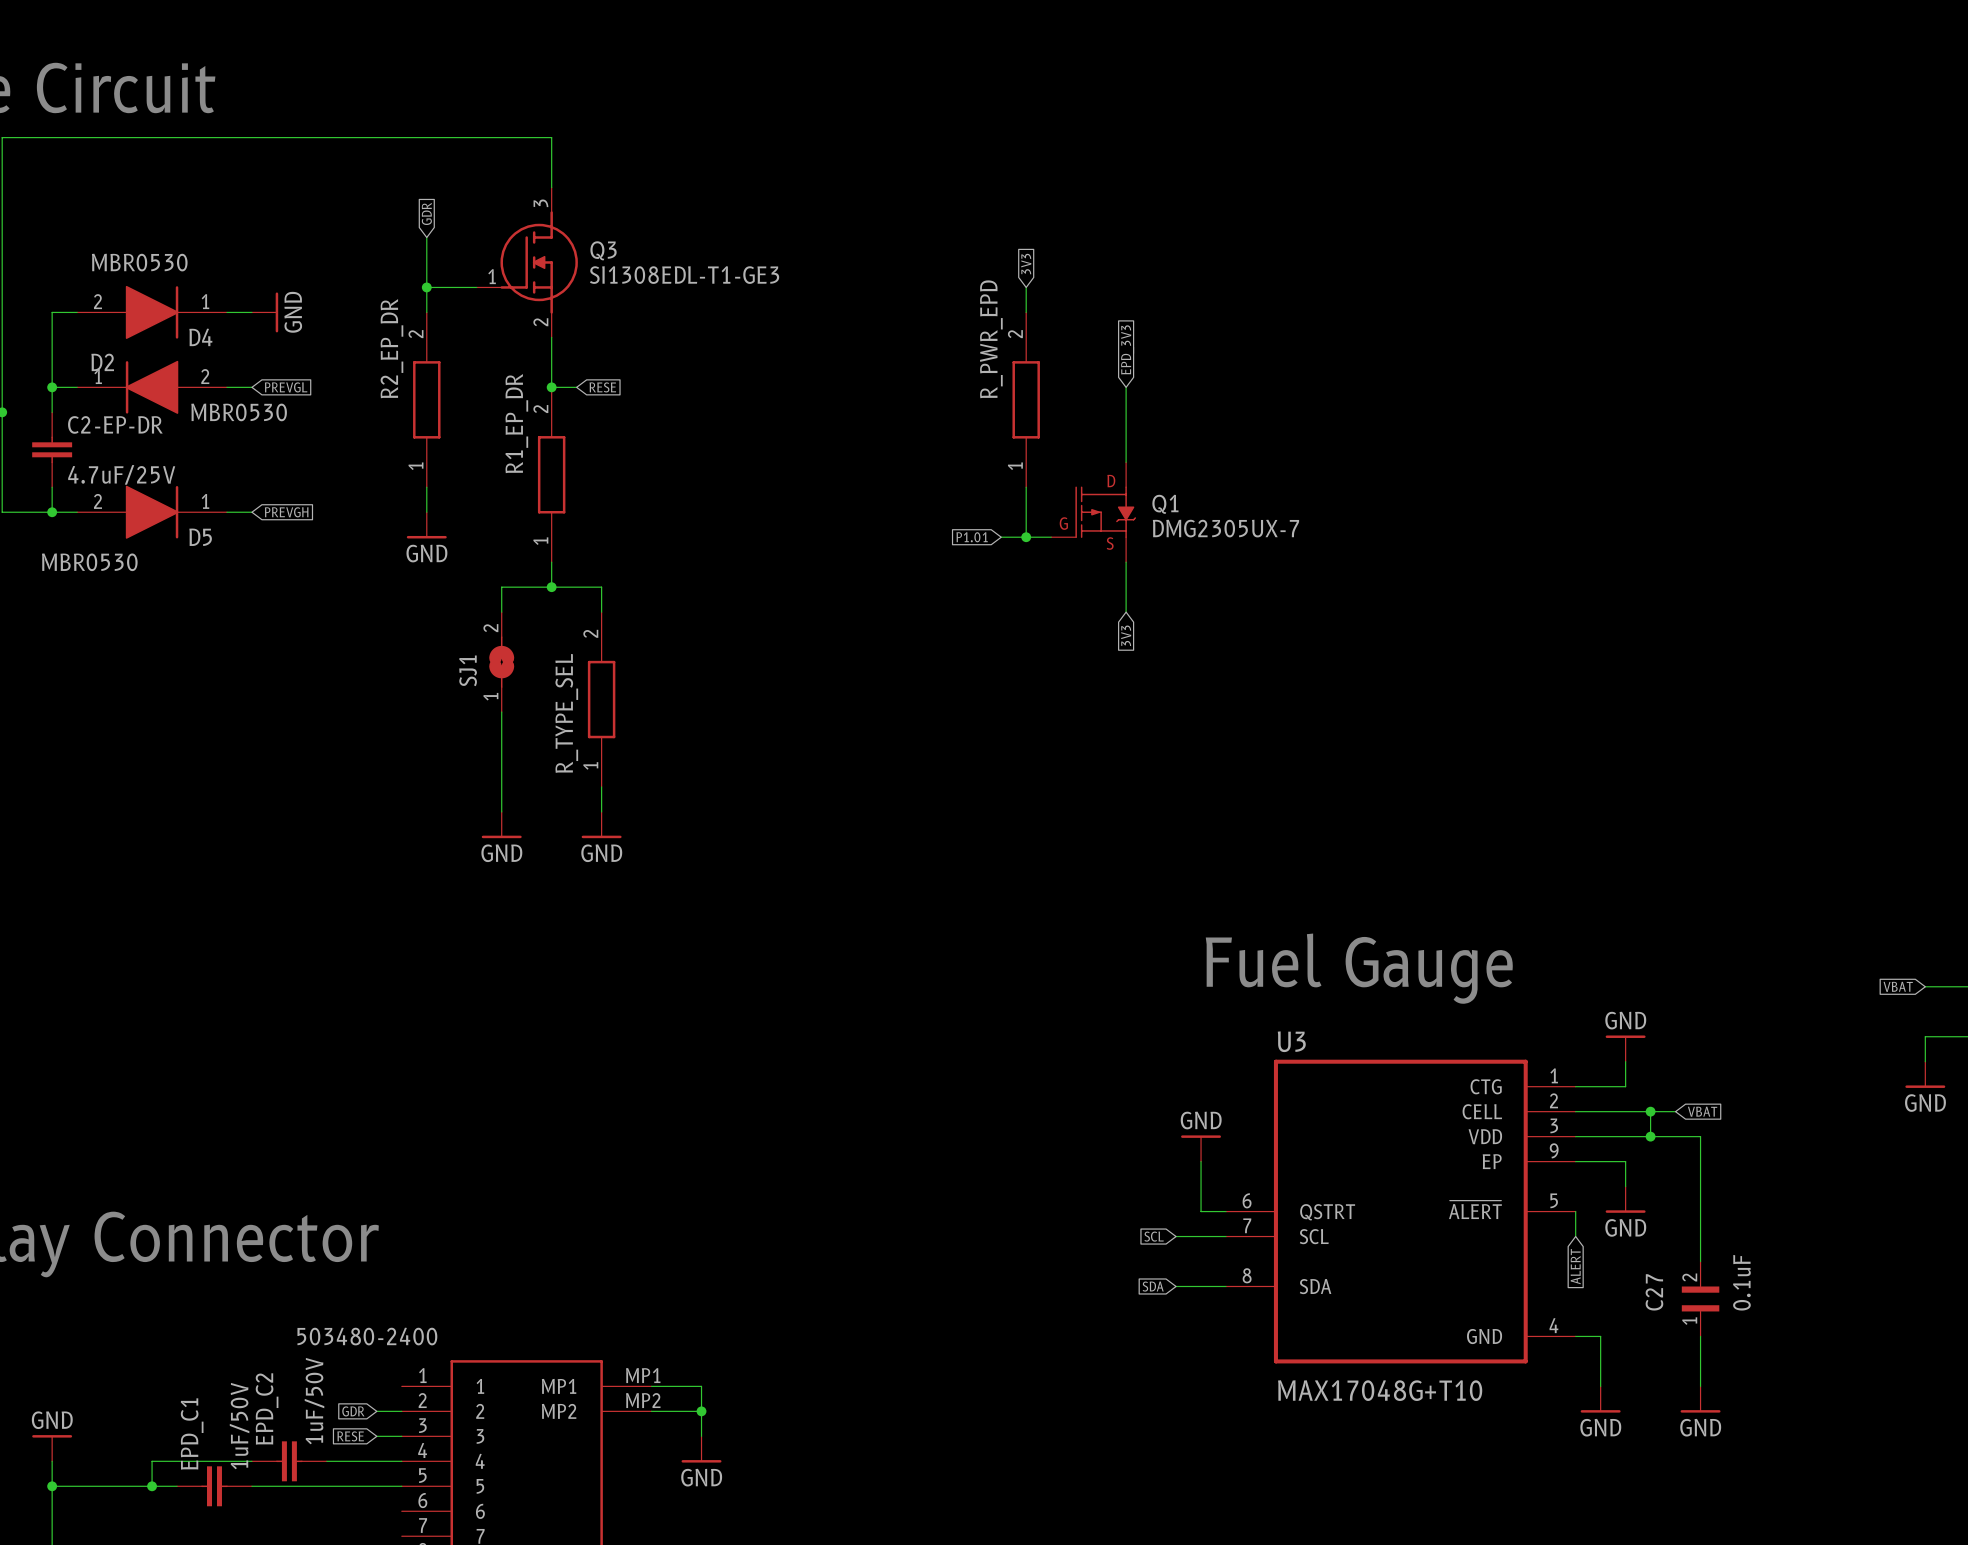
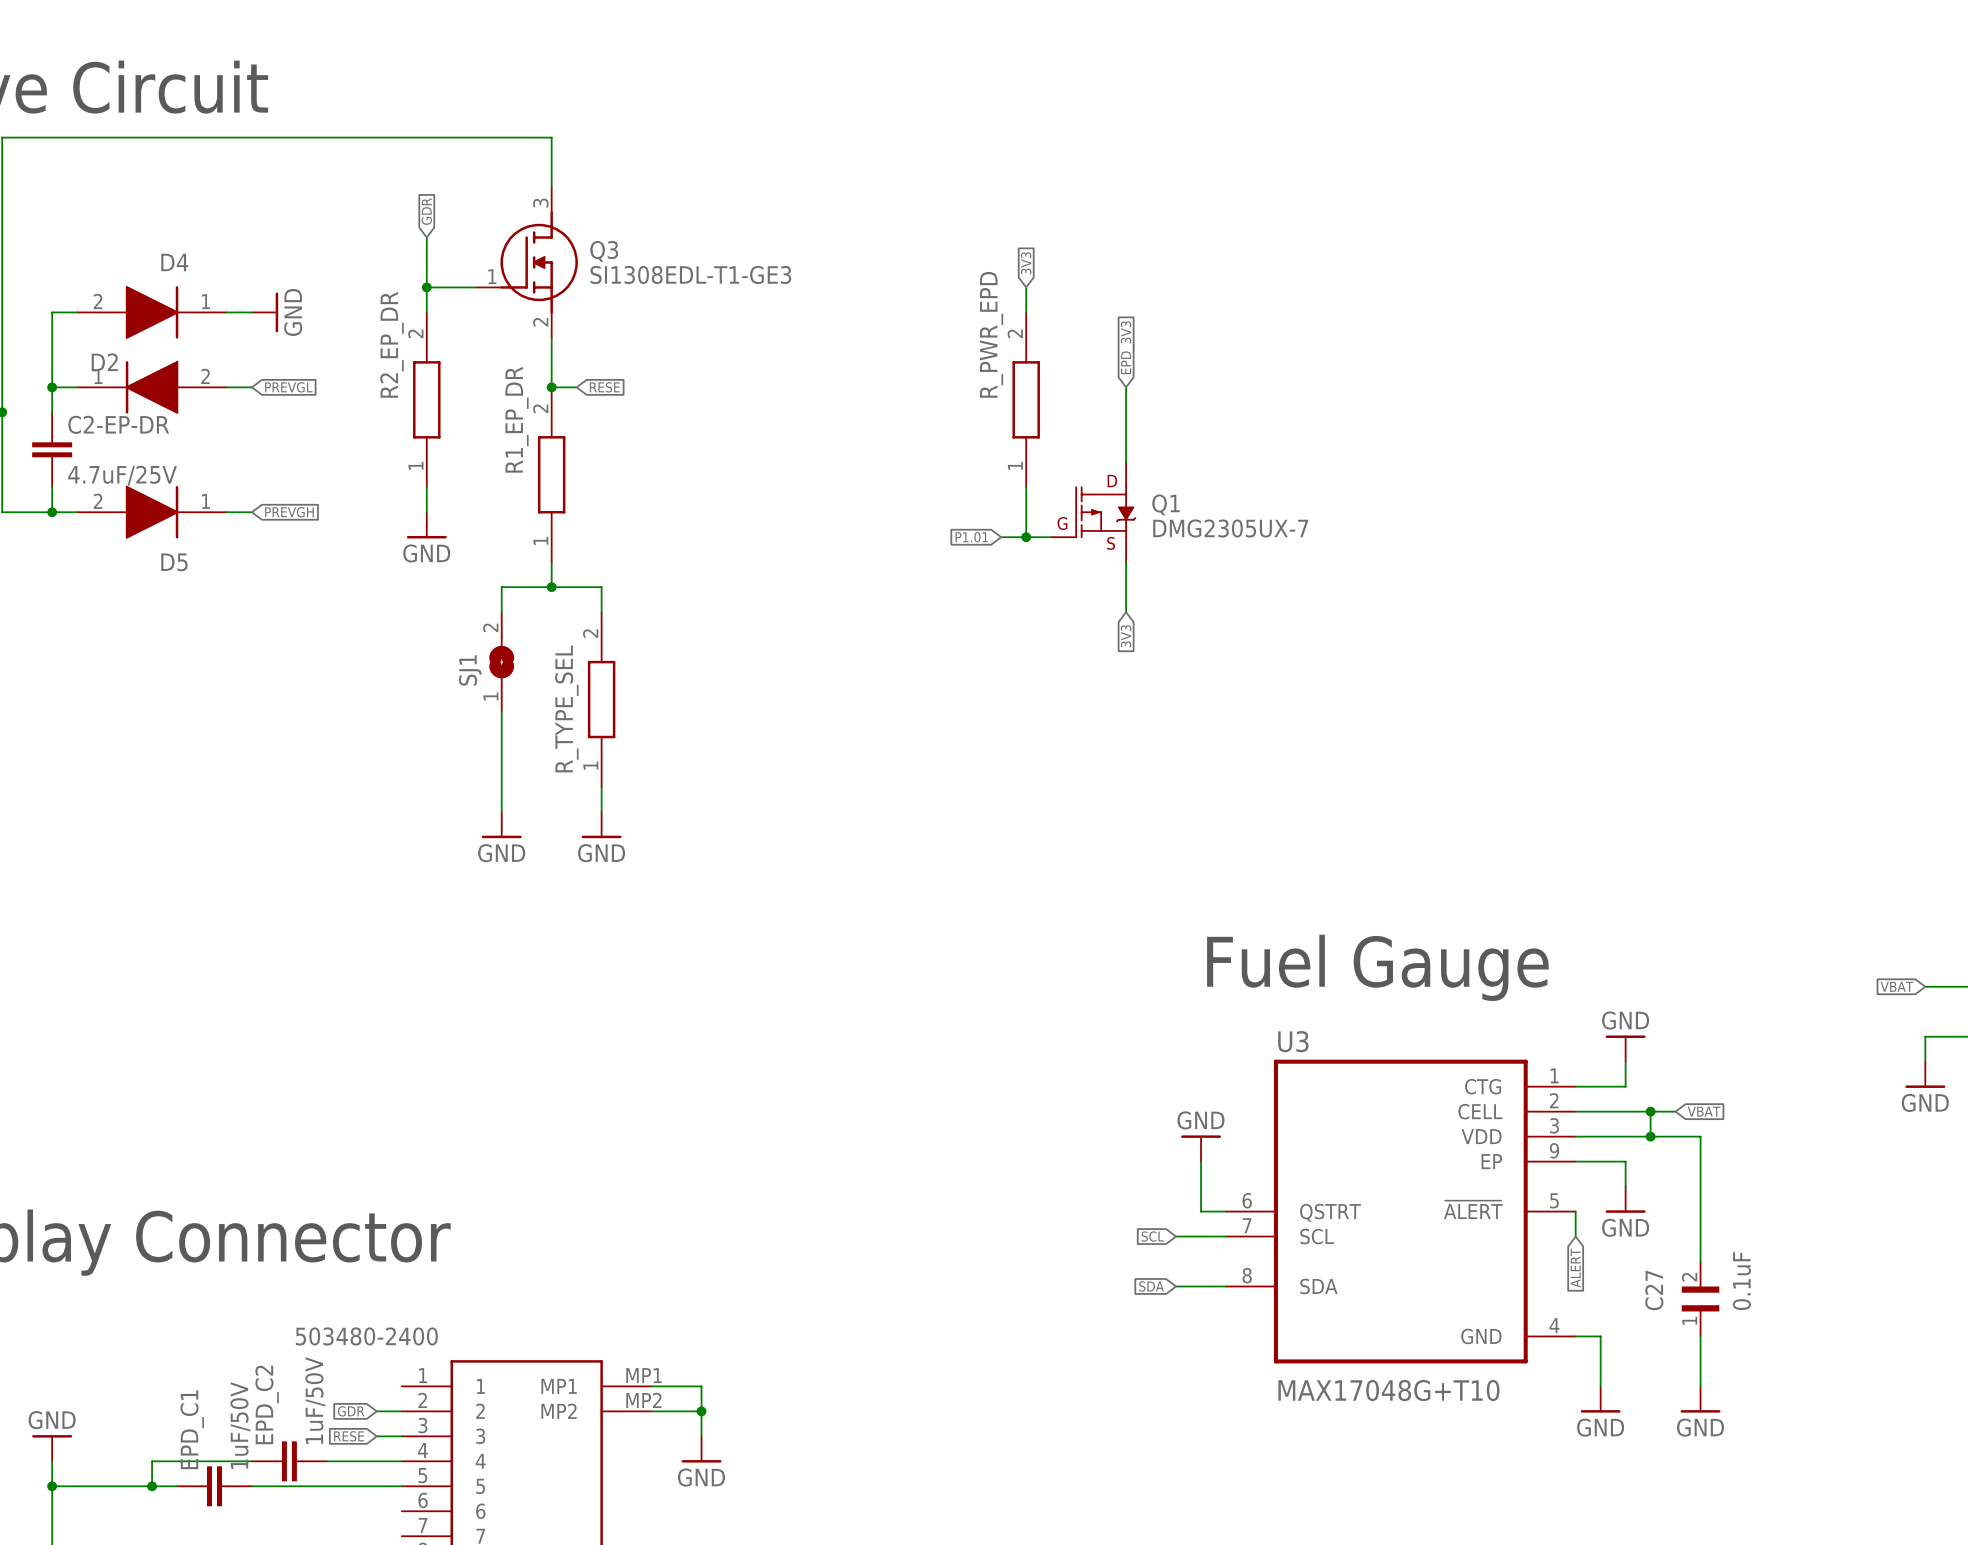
D4 value: MBR0530 (139, 262) -> none
D4 name position: D4 (200, 337) -> D4 (174, 262)
D2 value: MBR0530 (239, 412) -> none
D5 name position: D5 (200, 537) -> D5 (174, 562)
D5 value: MBR0530 (89, 562) -> none

